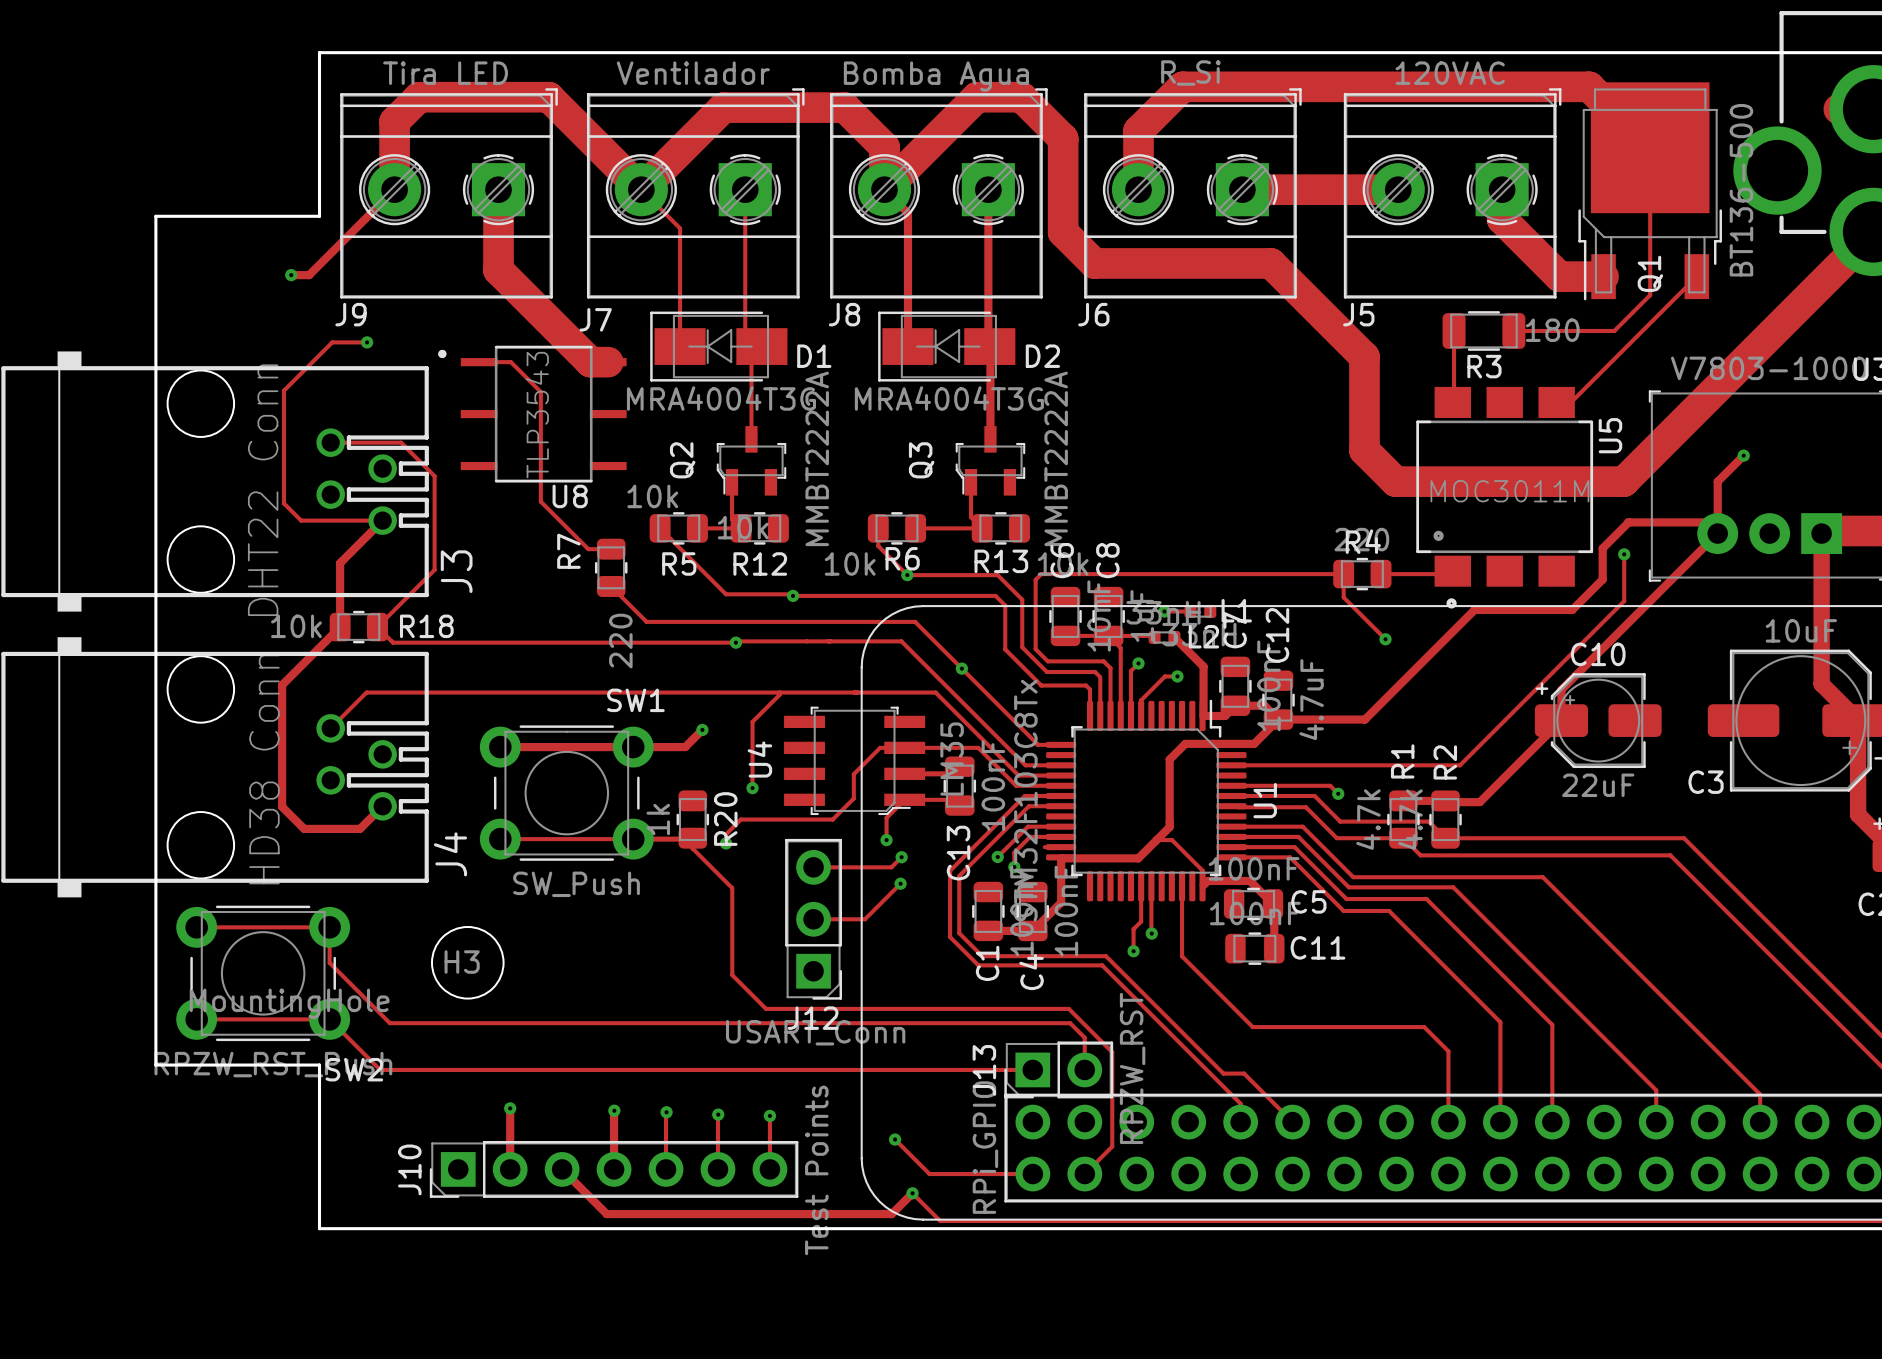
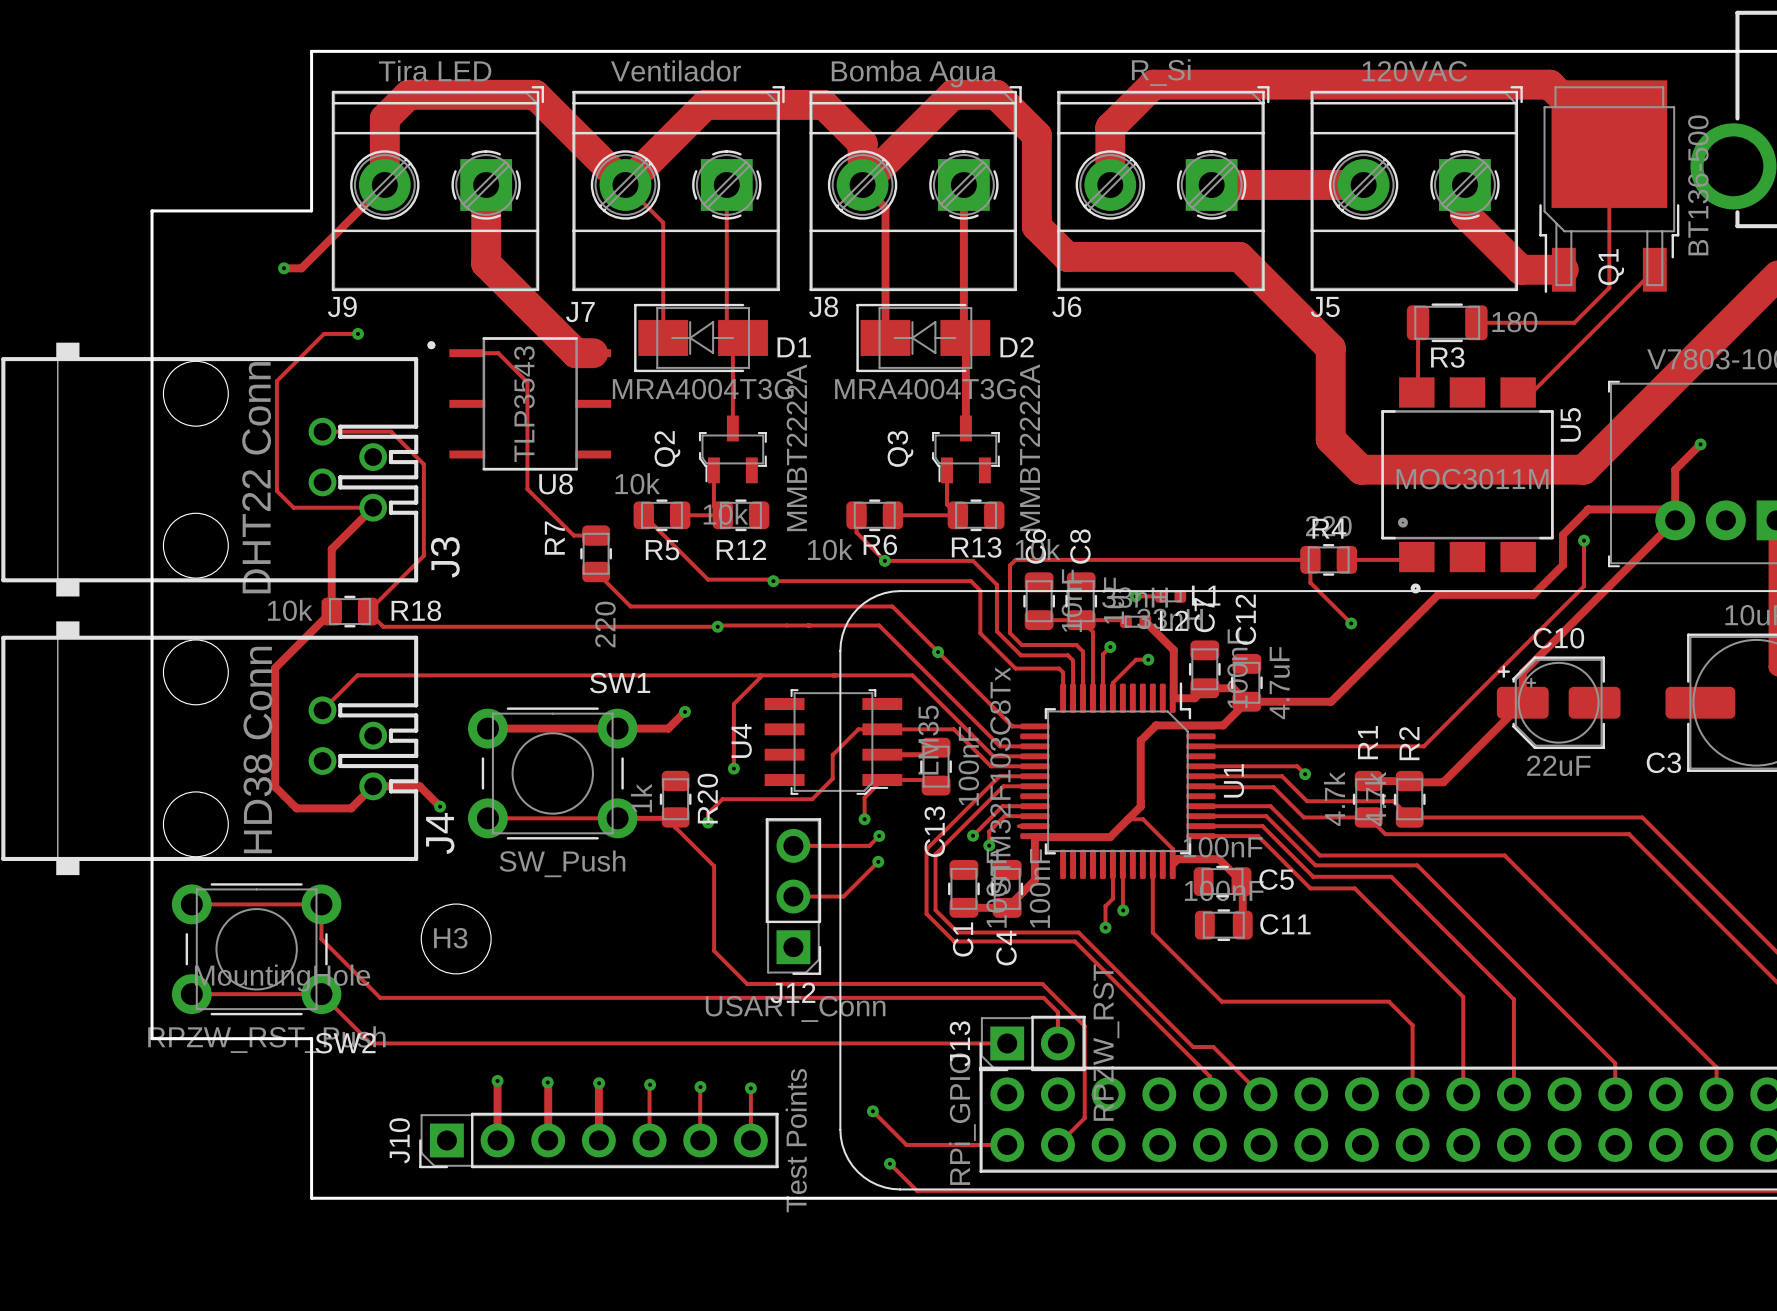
track: none -> (373, 786) (419, 786) (440, 806)
via: none -> (440, 806)
via: none -> (547, 1082)
track: (562, 1169) (606, 1214) (891, 1214) (912, 1193) -> (548, 1140) (547, 1082)

